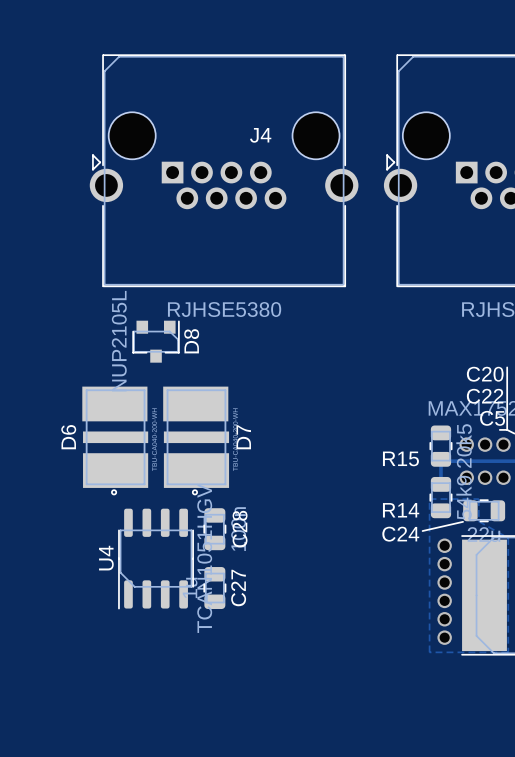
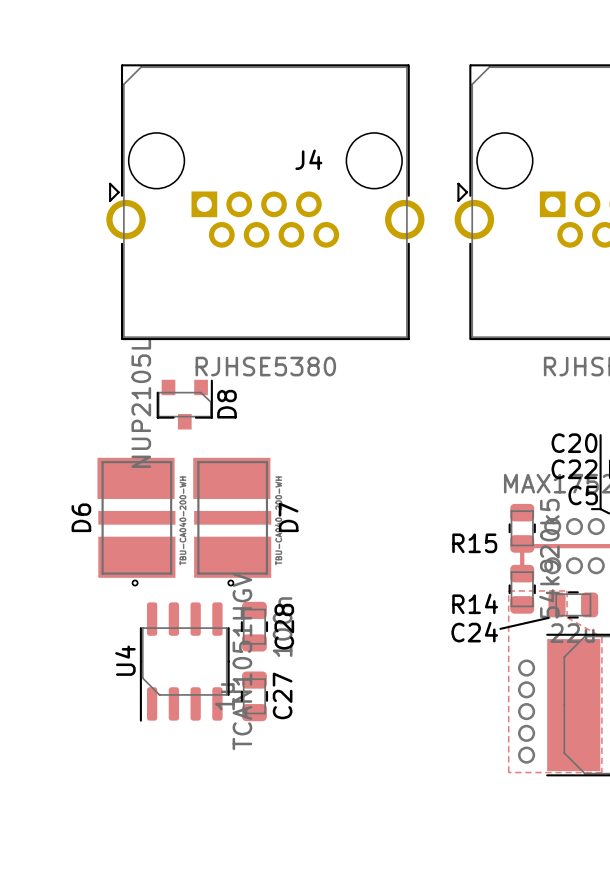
via: (444, 545) -> none

